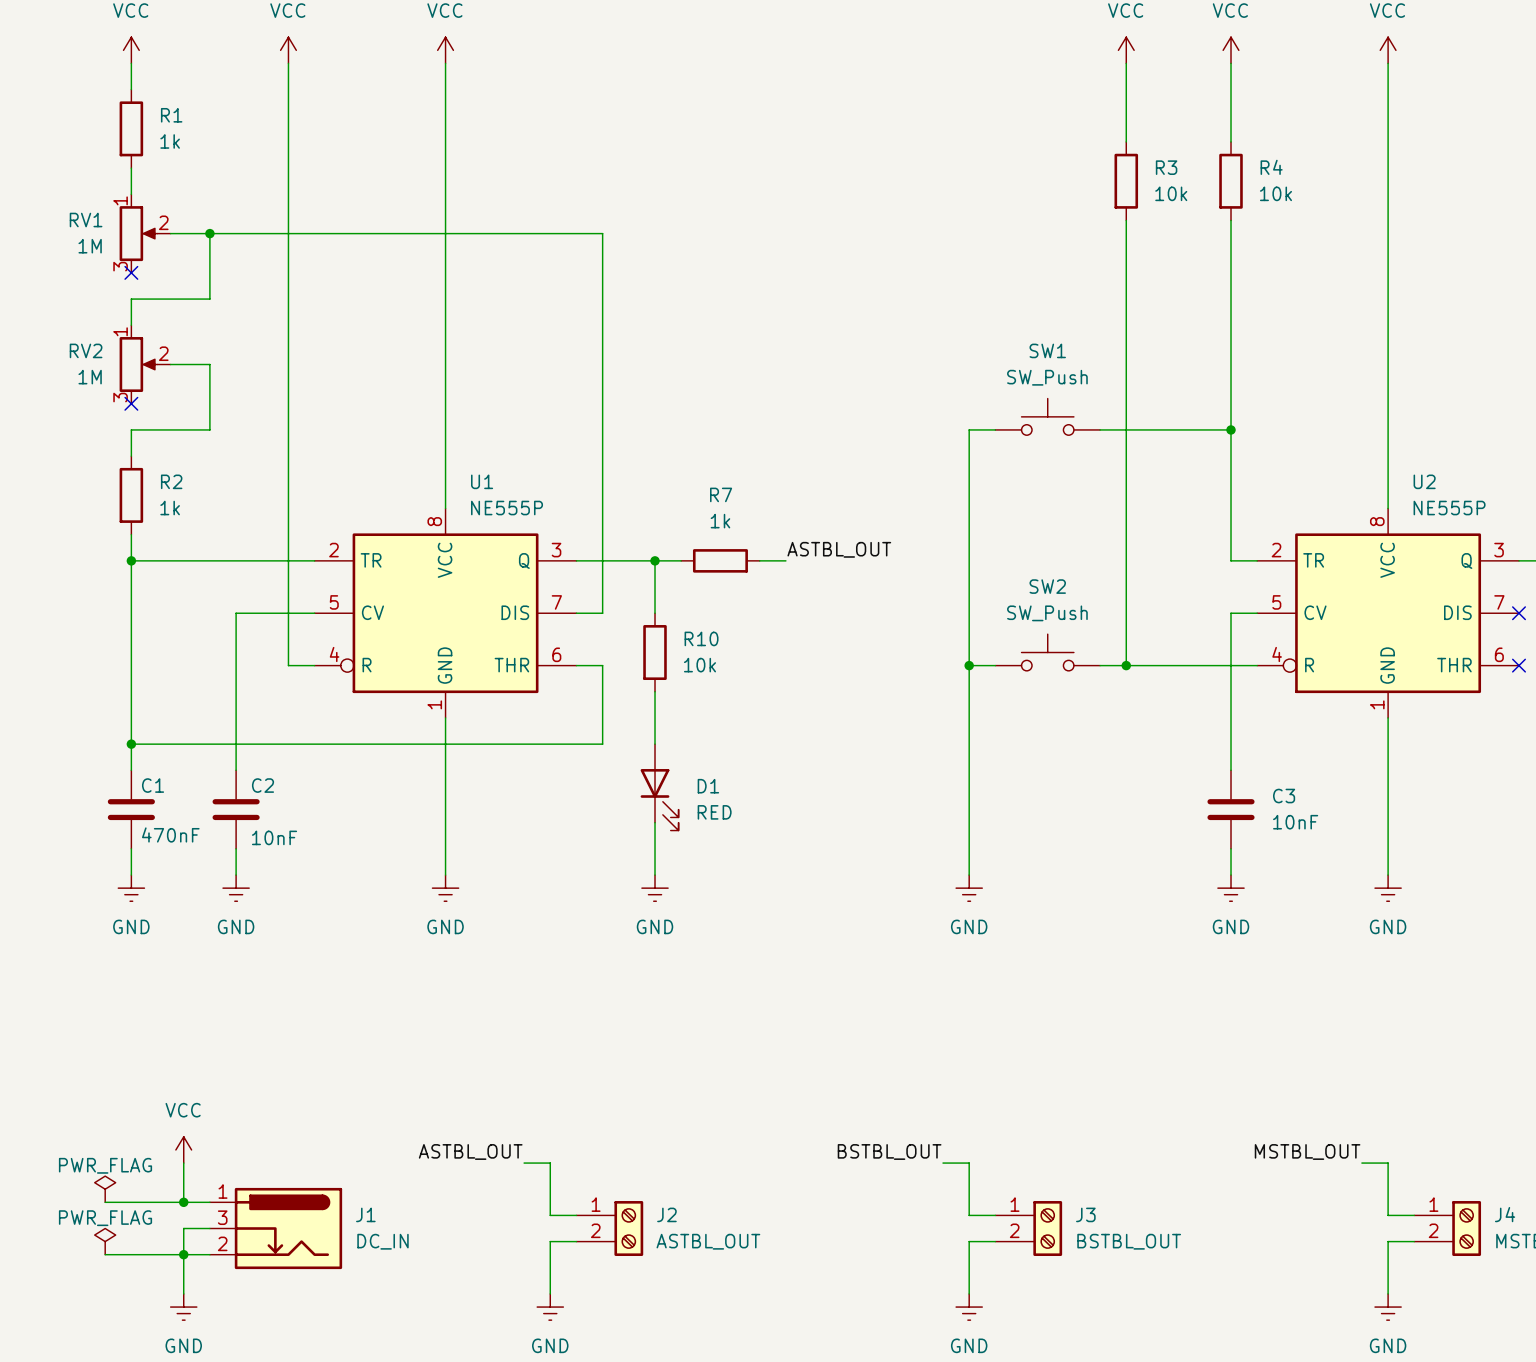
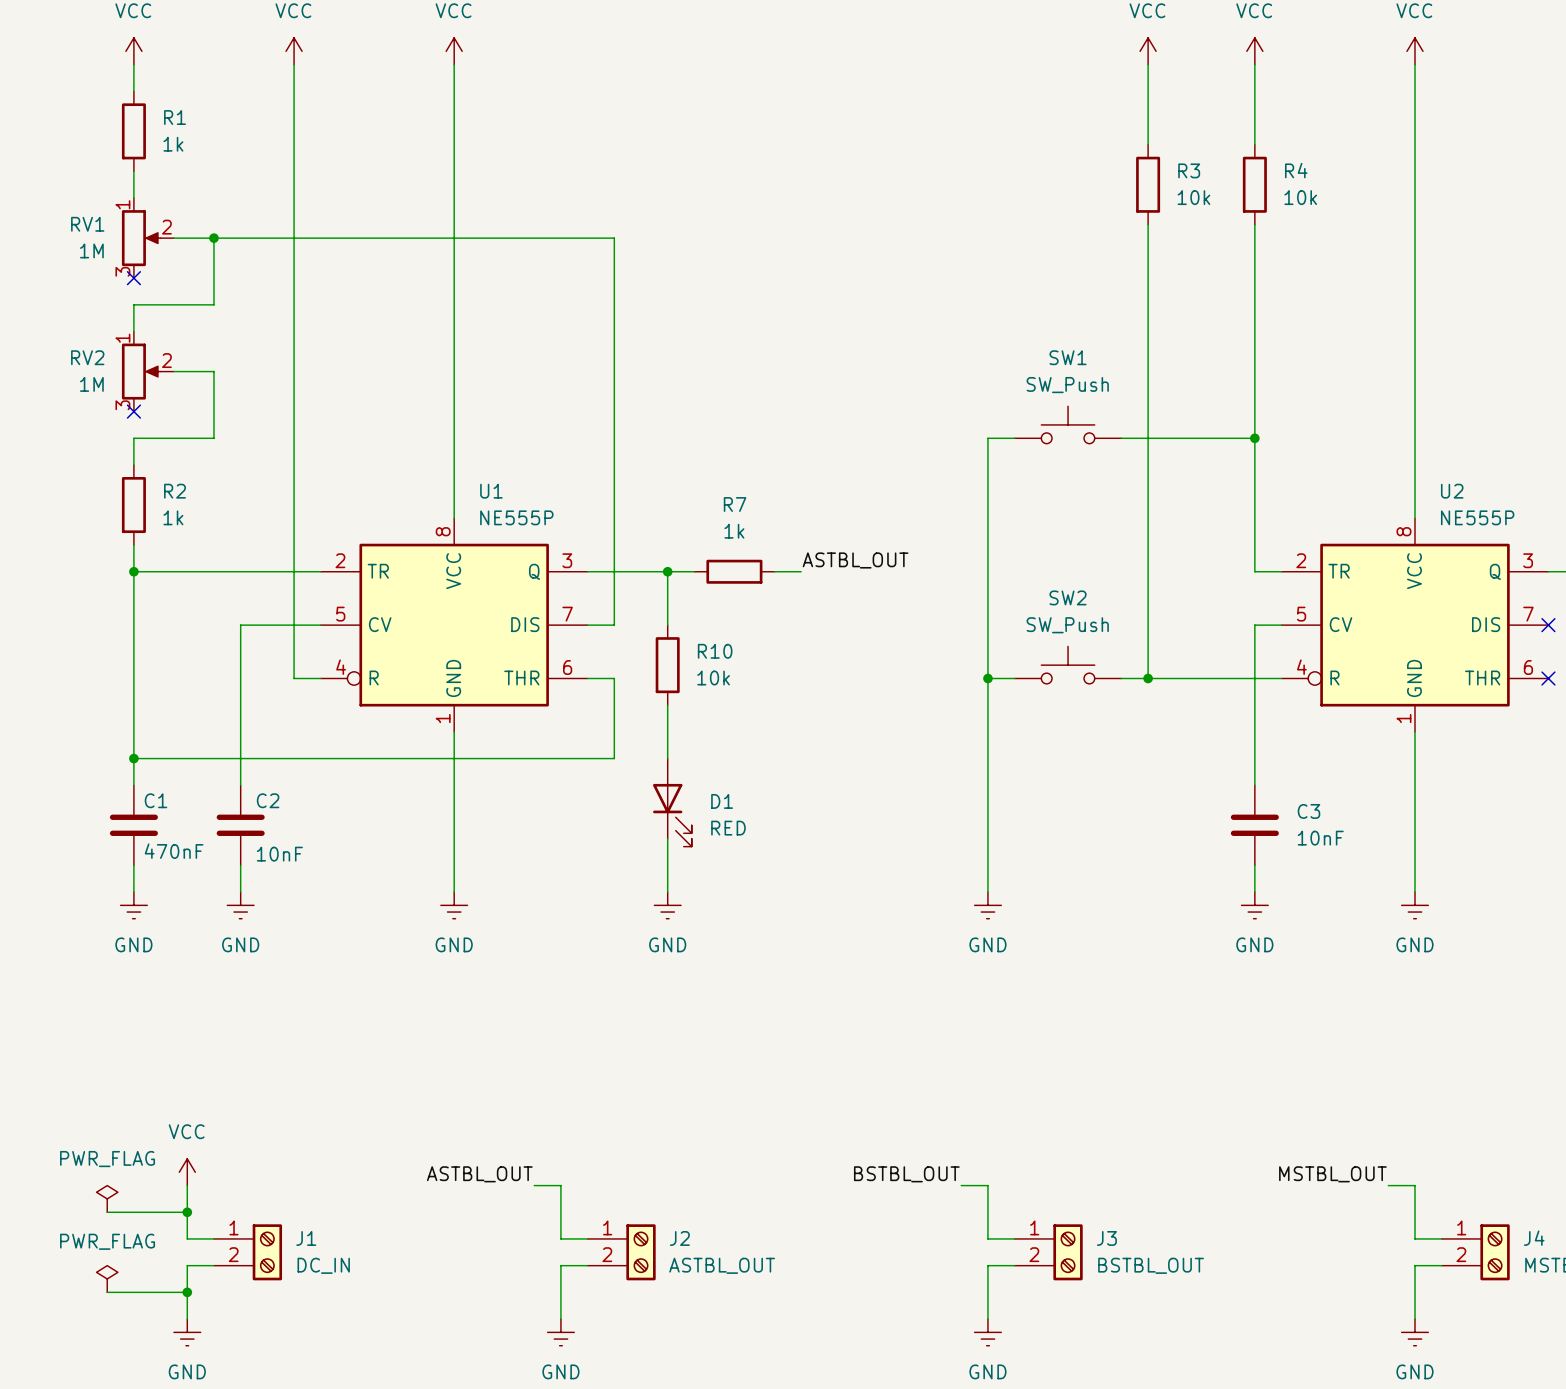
power symbol text position: PWR_FLAG (105, 1165) -> PWR_FLAG (107, 1159)
J1 symbol: [209, 1187, 343, 1270] -> [213, 1224, 283, 1281]
wire: none -> (107, 1212) (187, 1212)
power symbol position: PWR_FLAG (105, 1189) -> PWR_FLAG (107, 1198)
wire: (105, 1202) (209, 1202) -> none
wire: none -> (187, 1225) (187, 1238) (213, 1238)
junction position: (183, 1202) -> (187, 1212)
J1 name position: J1 (365, 1214) -> J1 (306, 1238)
wire: (209, 1228) (183, 1228) (183, 1241) -> (213, 1265) (187, 1265)
power symbol position: PWR_FLAG (105, 1241) -> PWR_FLAG (107, 1279)
J1 value position: DC_IN (383, 1241) -> DC_IN (323, 1265)
wire: (105, 1254) (209, 1254) -> none
junction position: (183, 1254) -> (187, 1292)
wire: none -> (107, 1292) (187, 1292)

